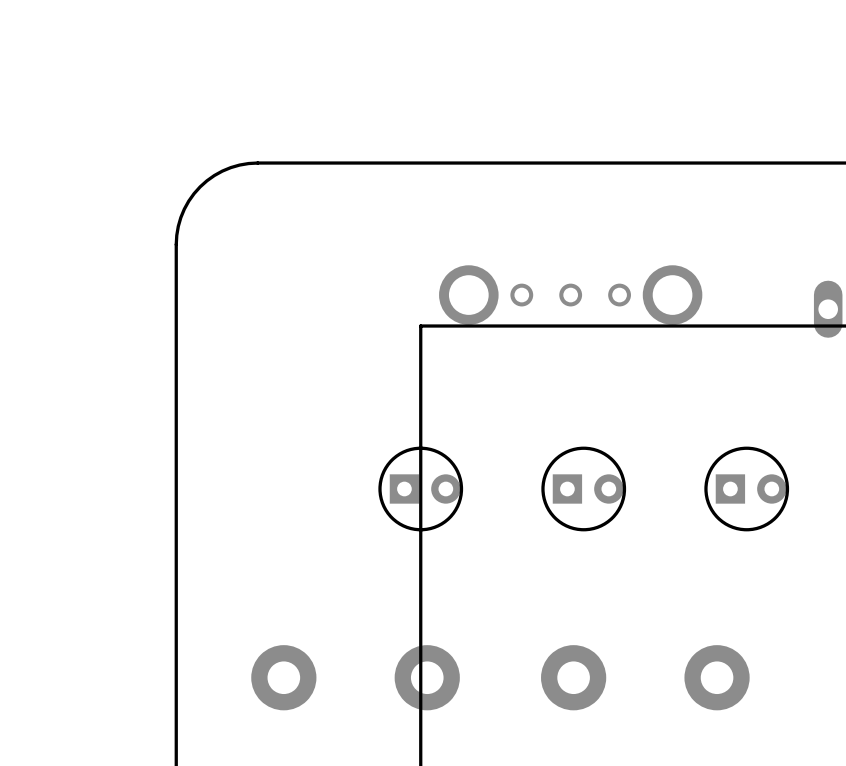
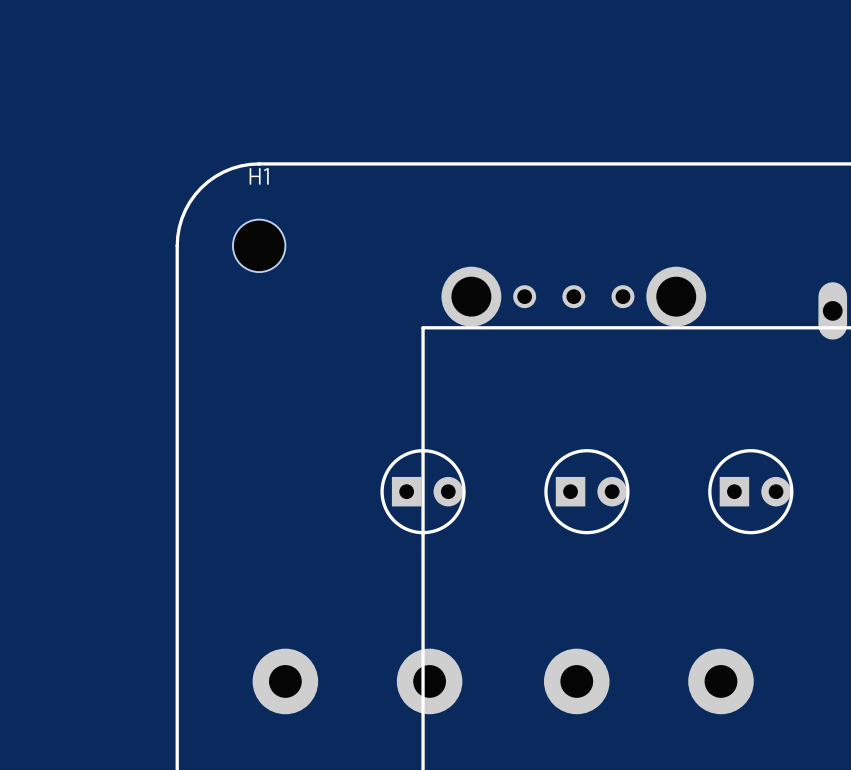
H1: none -> (259, 245)

